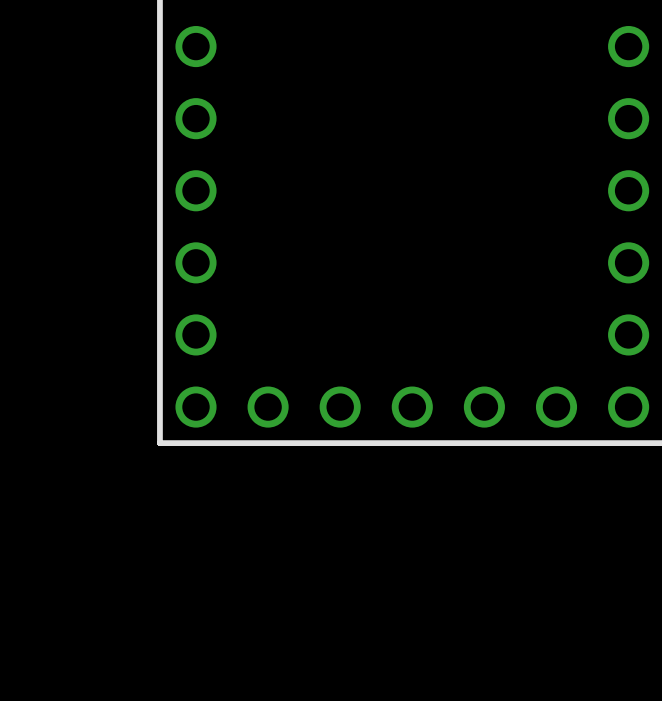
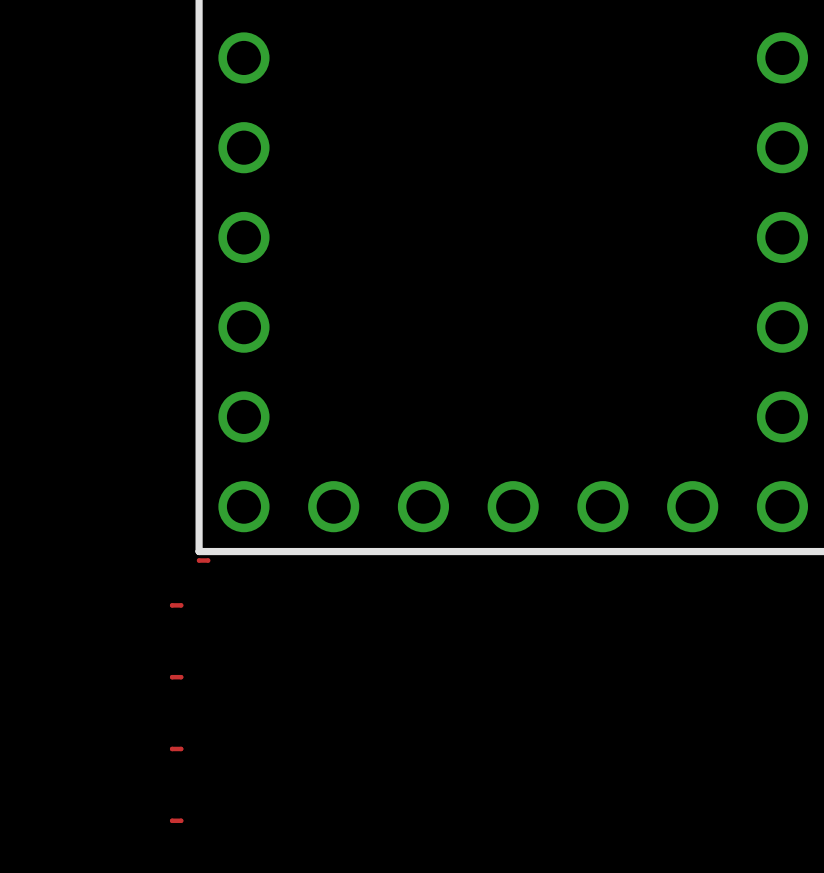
part: none -> (203, 560)
part: none -> (176, 605)
part: none -> (176, 677)
part: none -> (176, 748)
part: none -> (176, 820)

